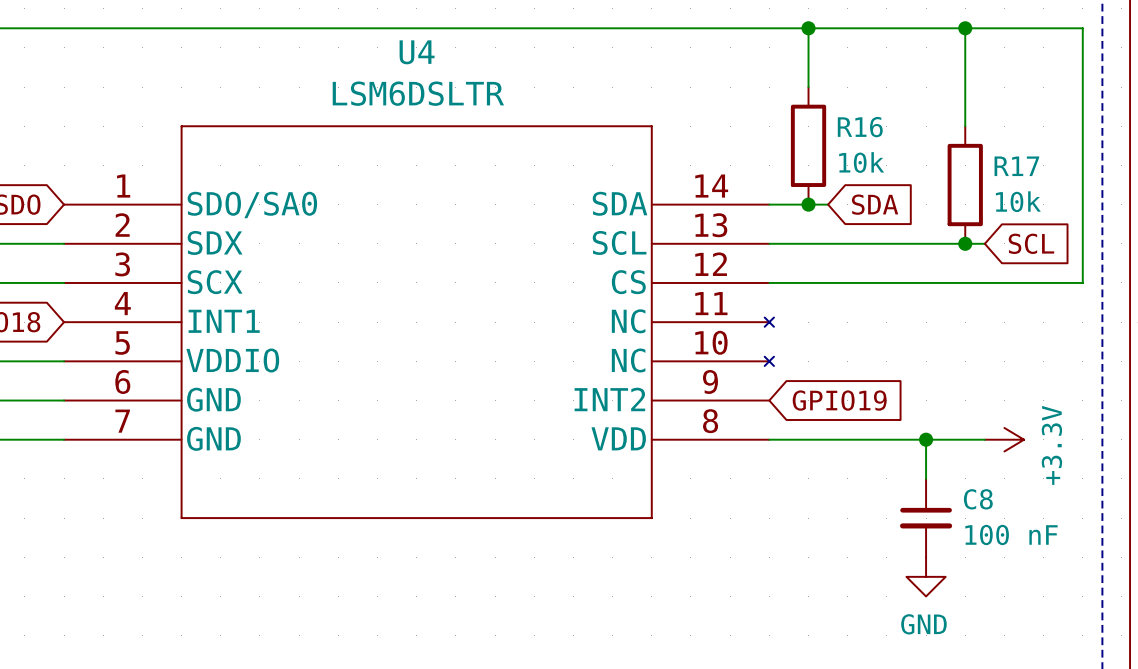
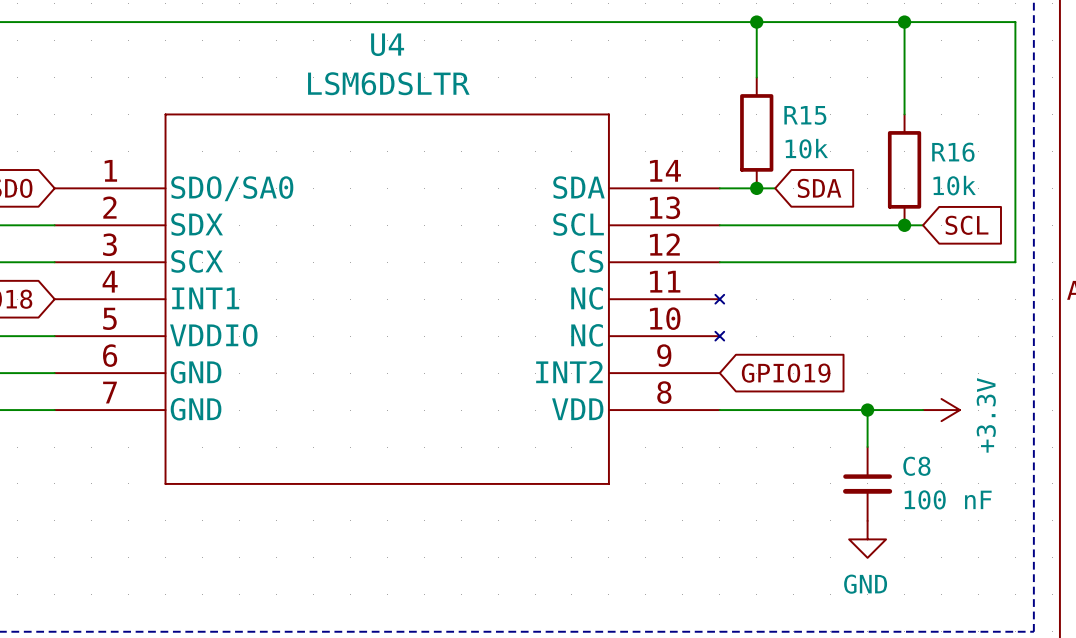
R16 name: R16 (860, 127) -> R15 (805, 115)
R17 name: R17 (1016, 166) -> R16 (953, 152)

